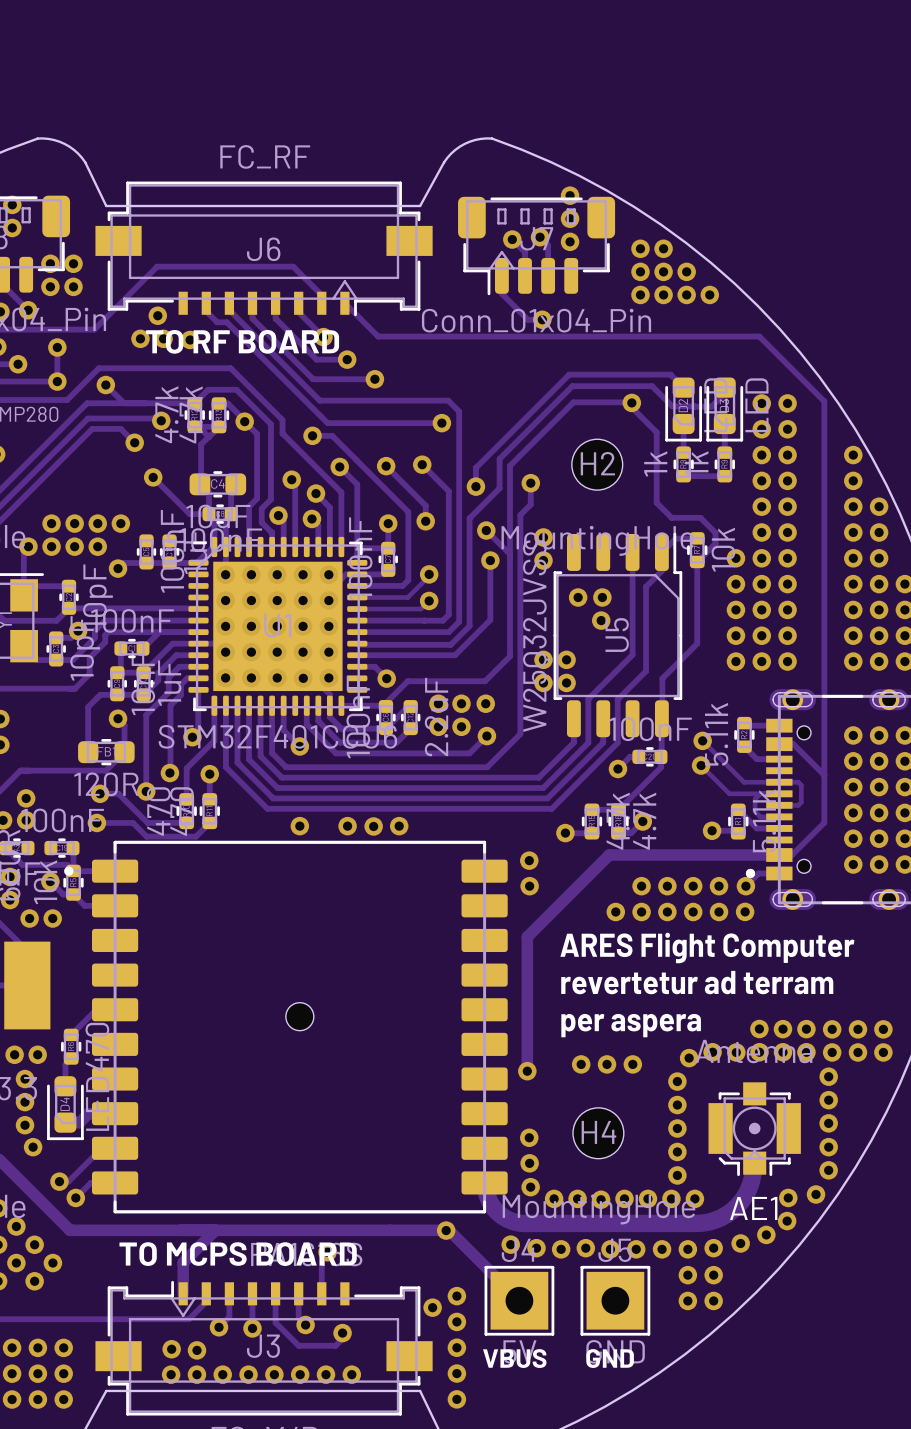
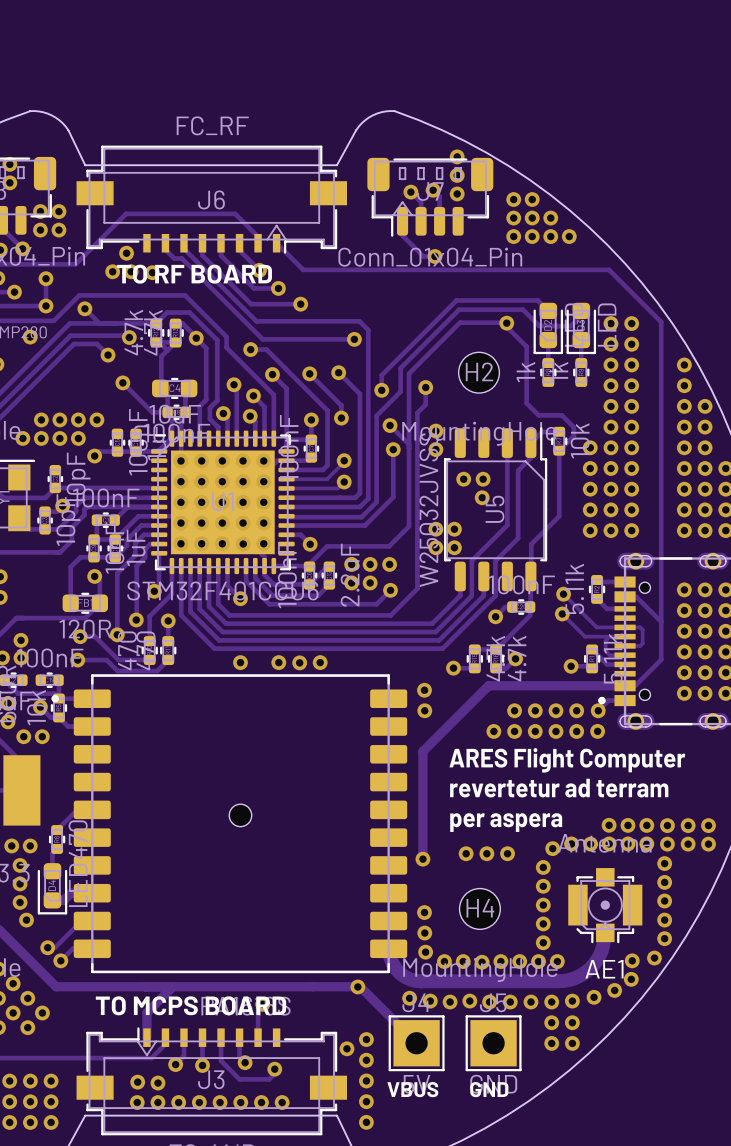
via: none -> (30, 337)
track: (683, 476) (724, 476) -> none
track: (23, 551) (23, 595) -> none
track: (69, 582) (69, 586) (31, 586) -> none

